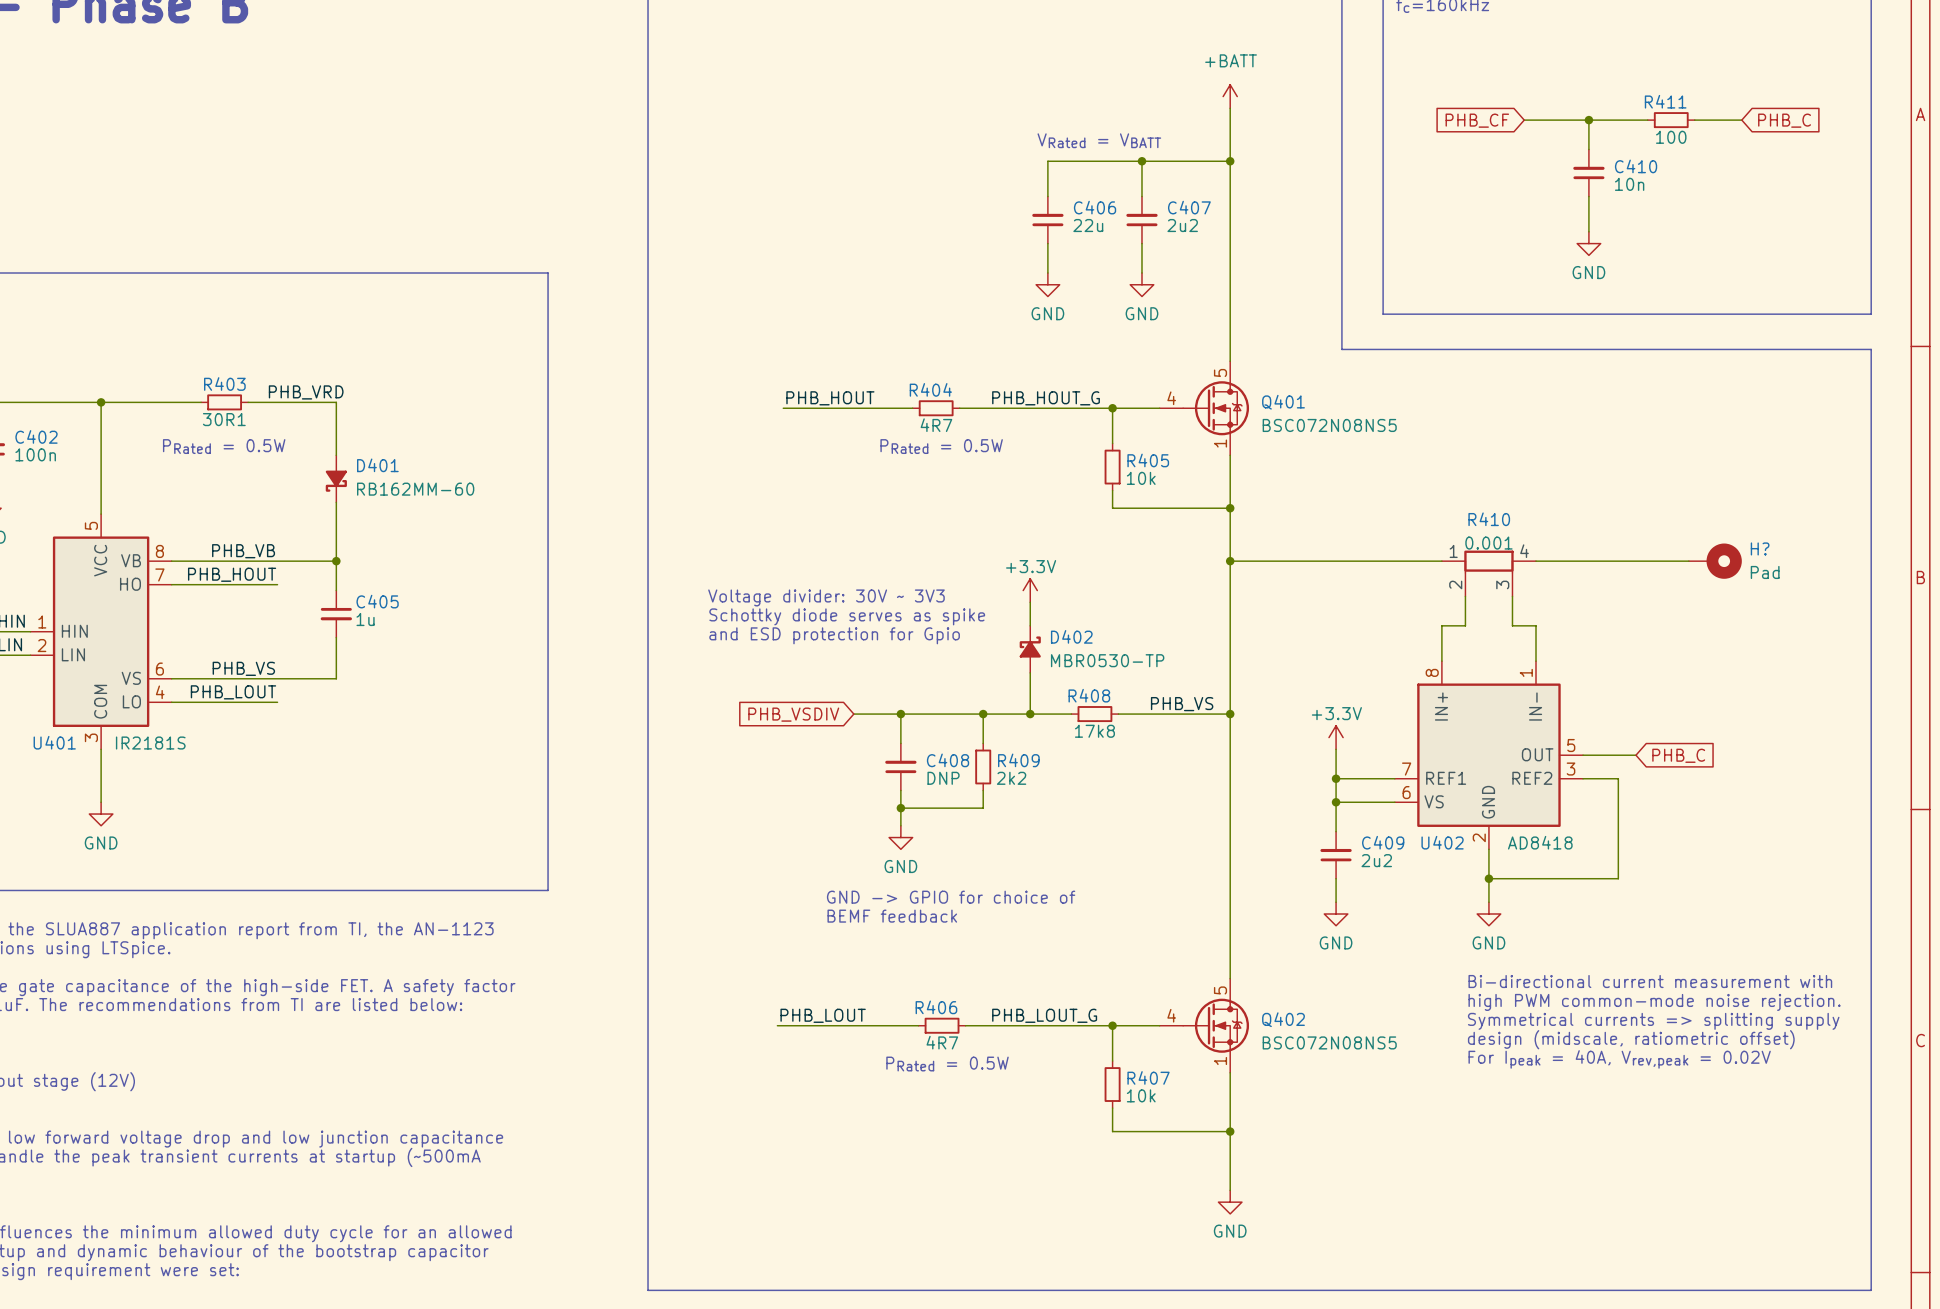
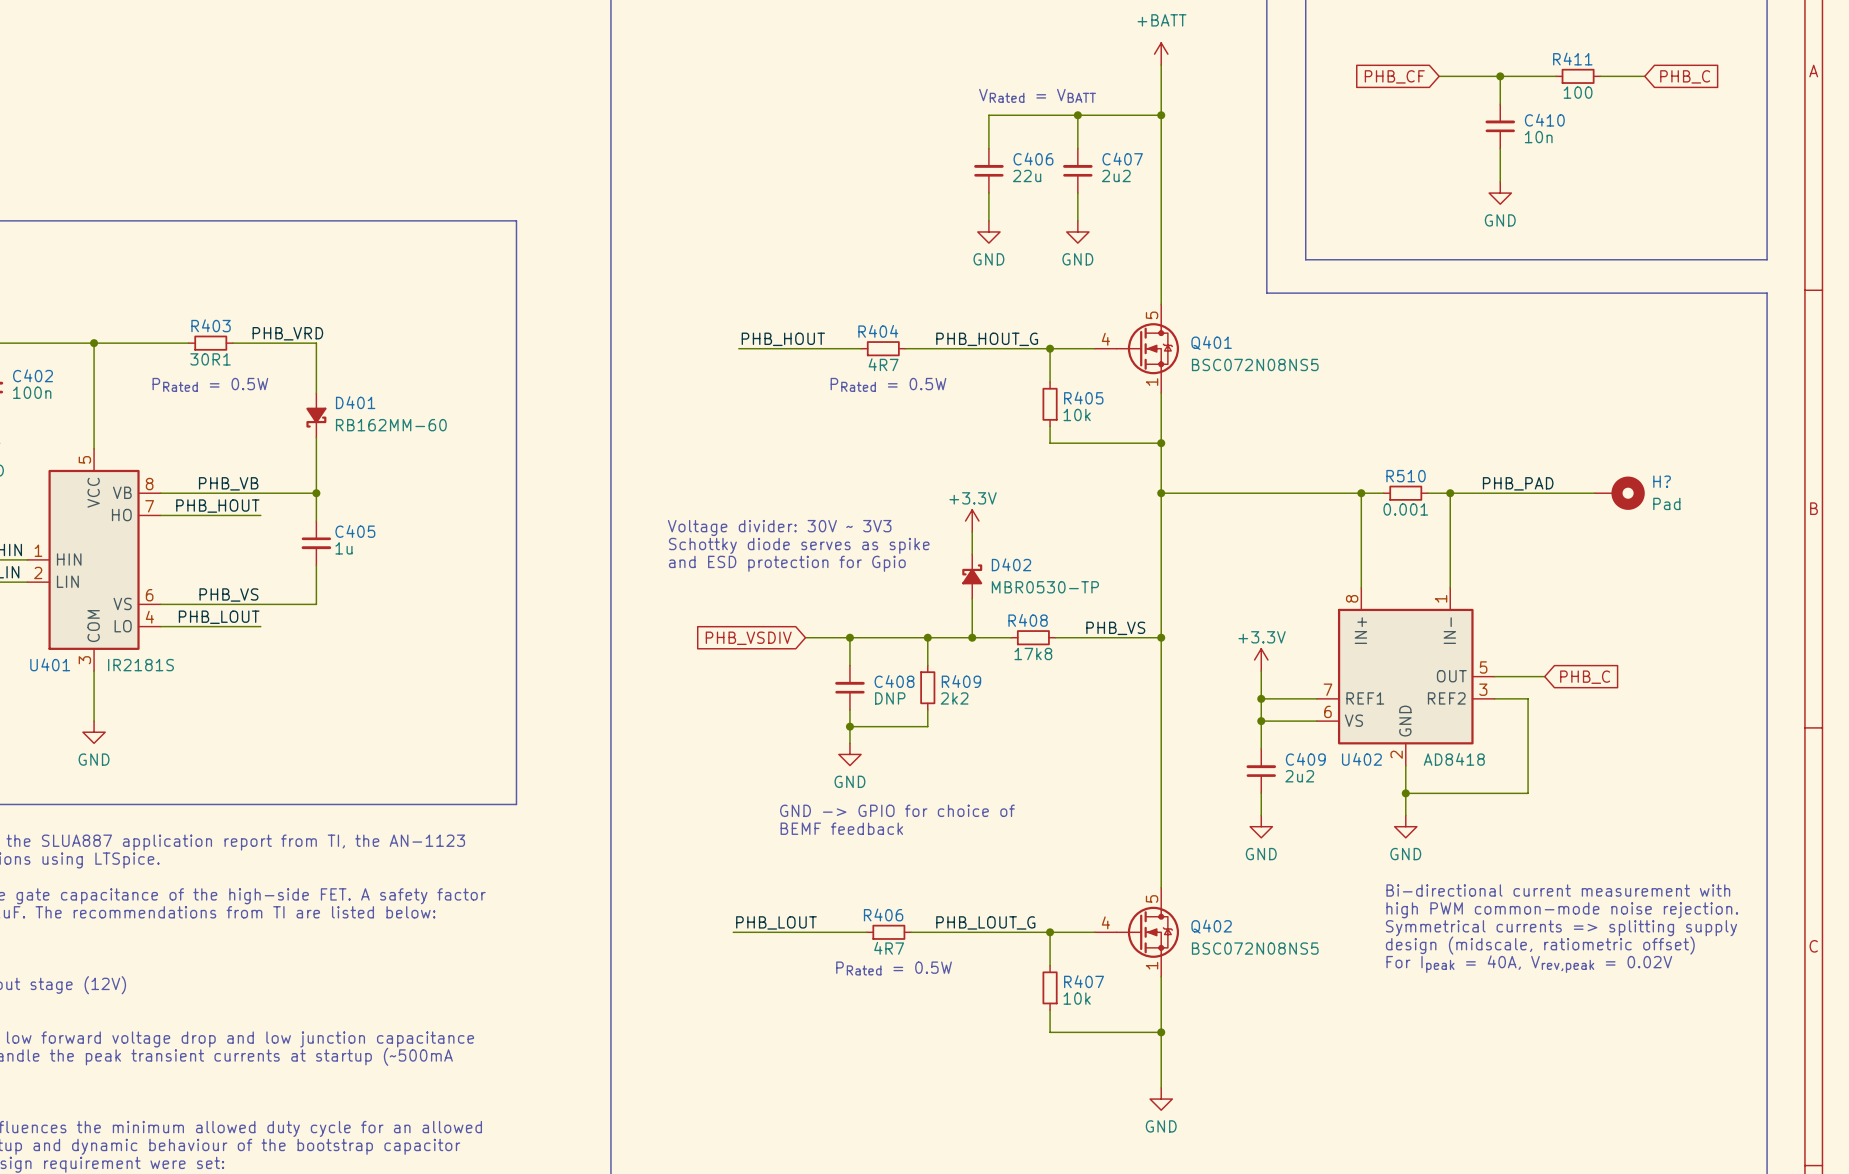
label: none -> PHB_PAD (1518, 483)
junction: none -> (1361, 493)
R510: none -> 0.001 (1405, 493)
junction: none -> (1450, 493)
R410: 0.001 (1488, 573) -> none
wire: (1465, 596) (1465, 625) (1441, 625) -> (1383, 493) (1361, 493) (1361, 554)
wire: (1512, 596) (1512, 625) (1536, 625) -> (1428, 493) (1450, 493) (1450, 554)

